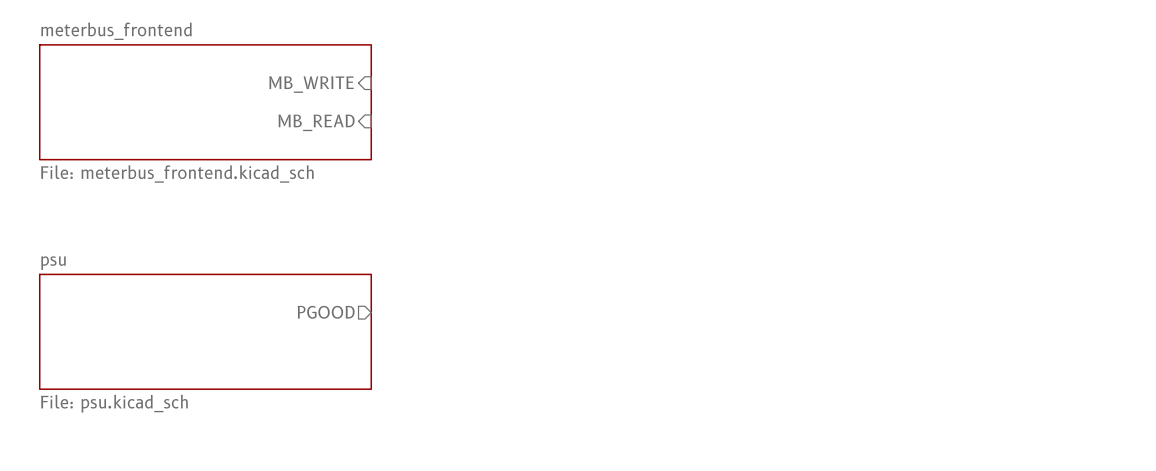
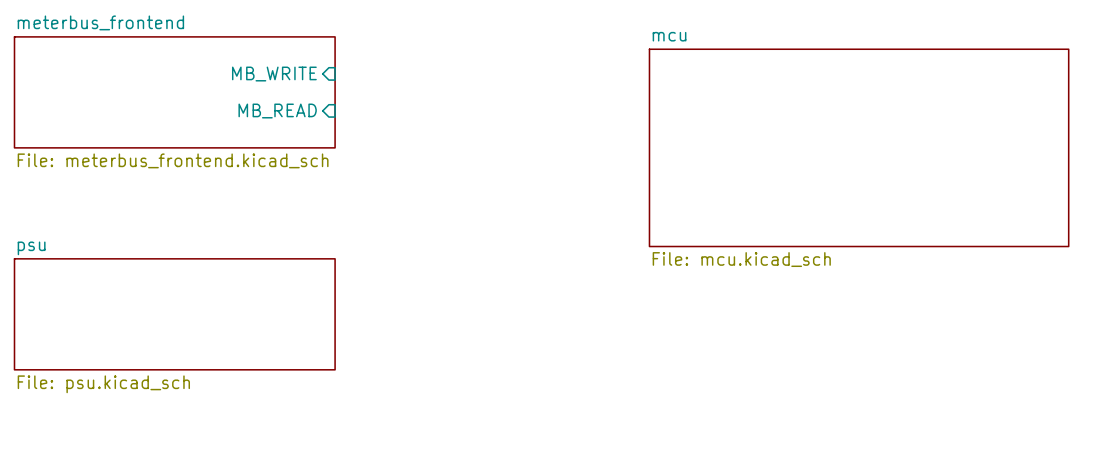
sheet mcu: none -> File: mcu.kicad_sch (859, 147)
sheet pin: PGOOD (326, 312) -> none

